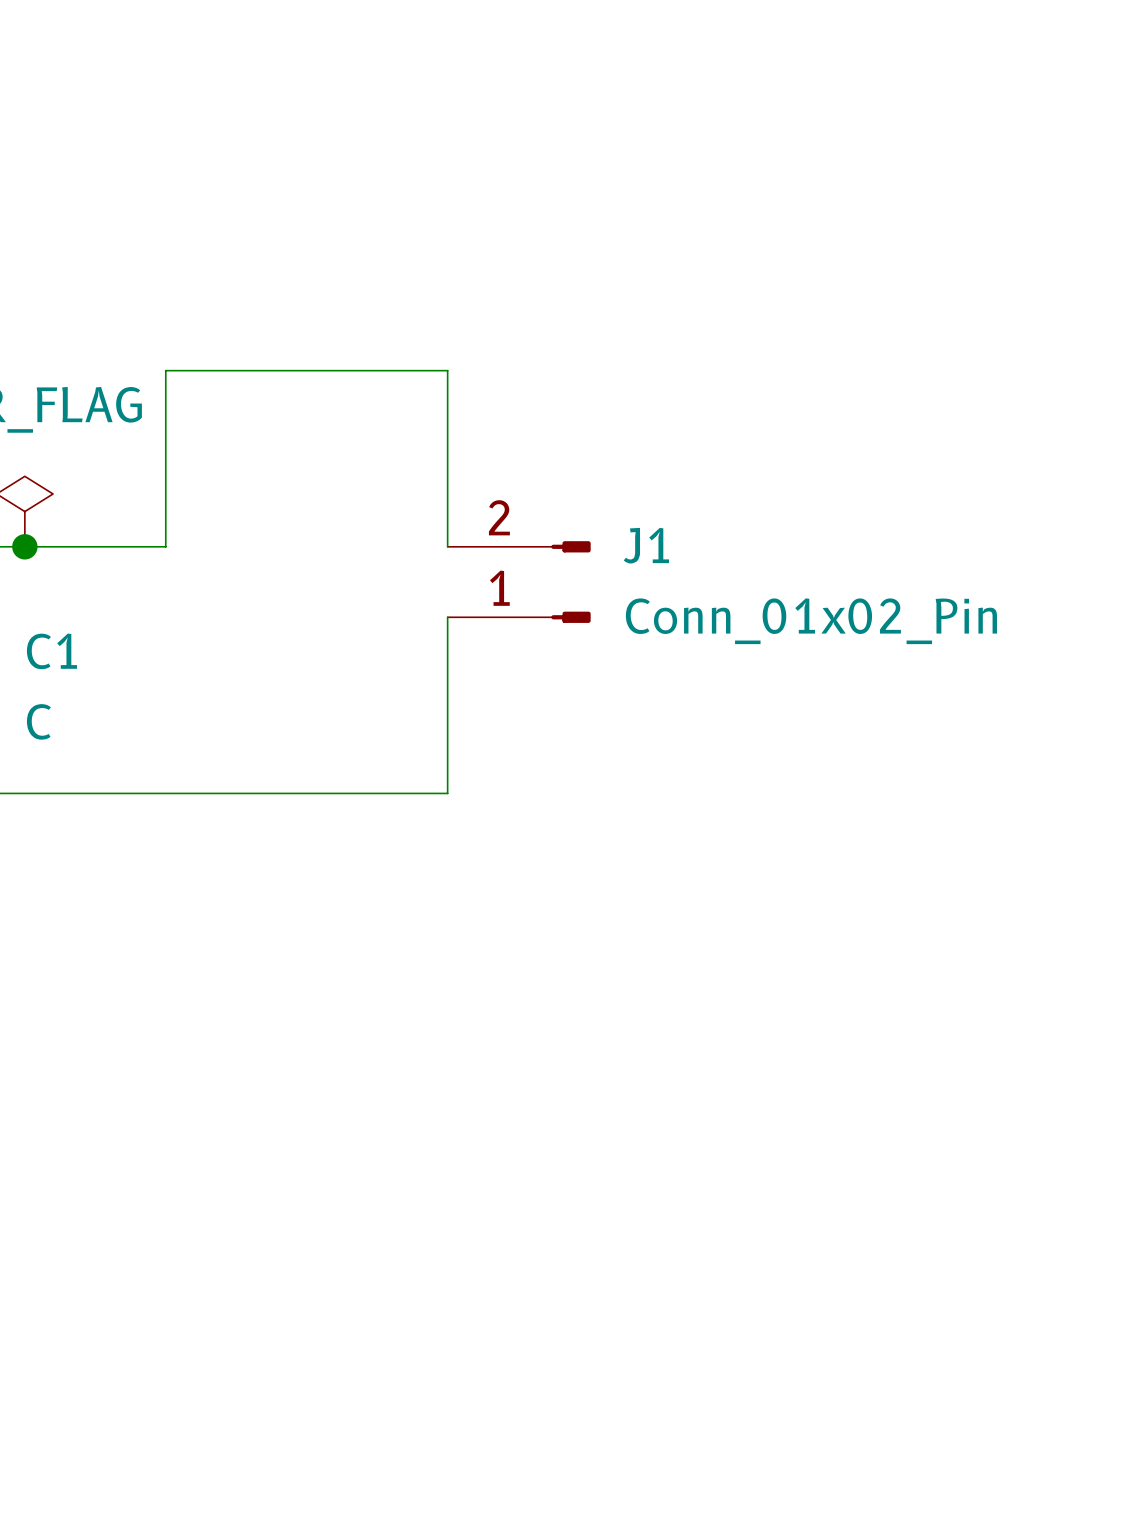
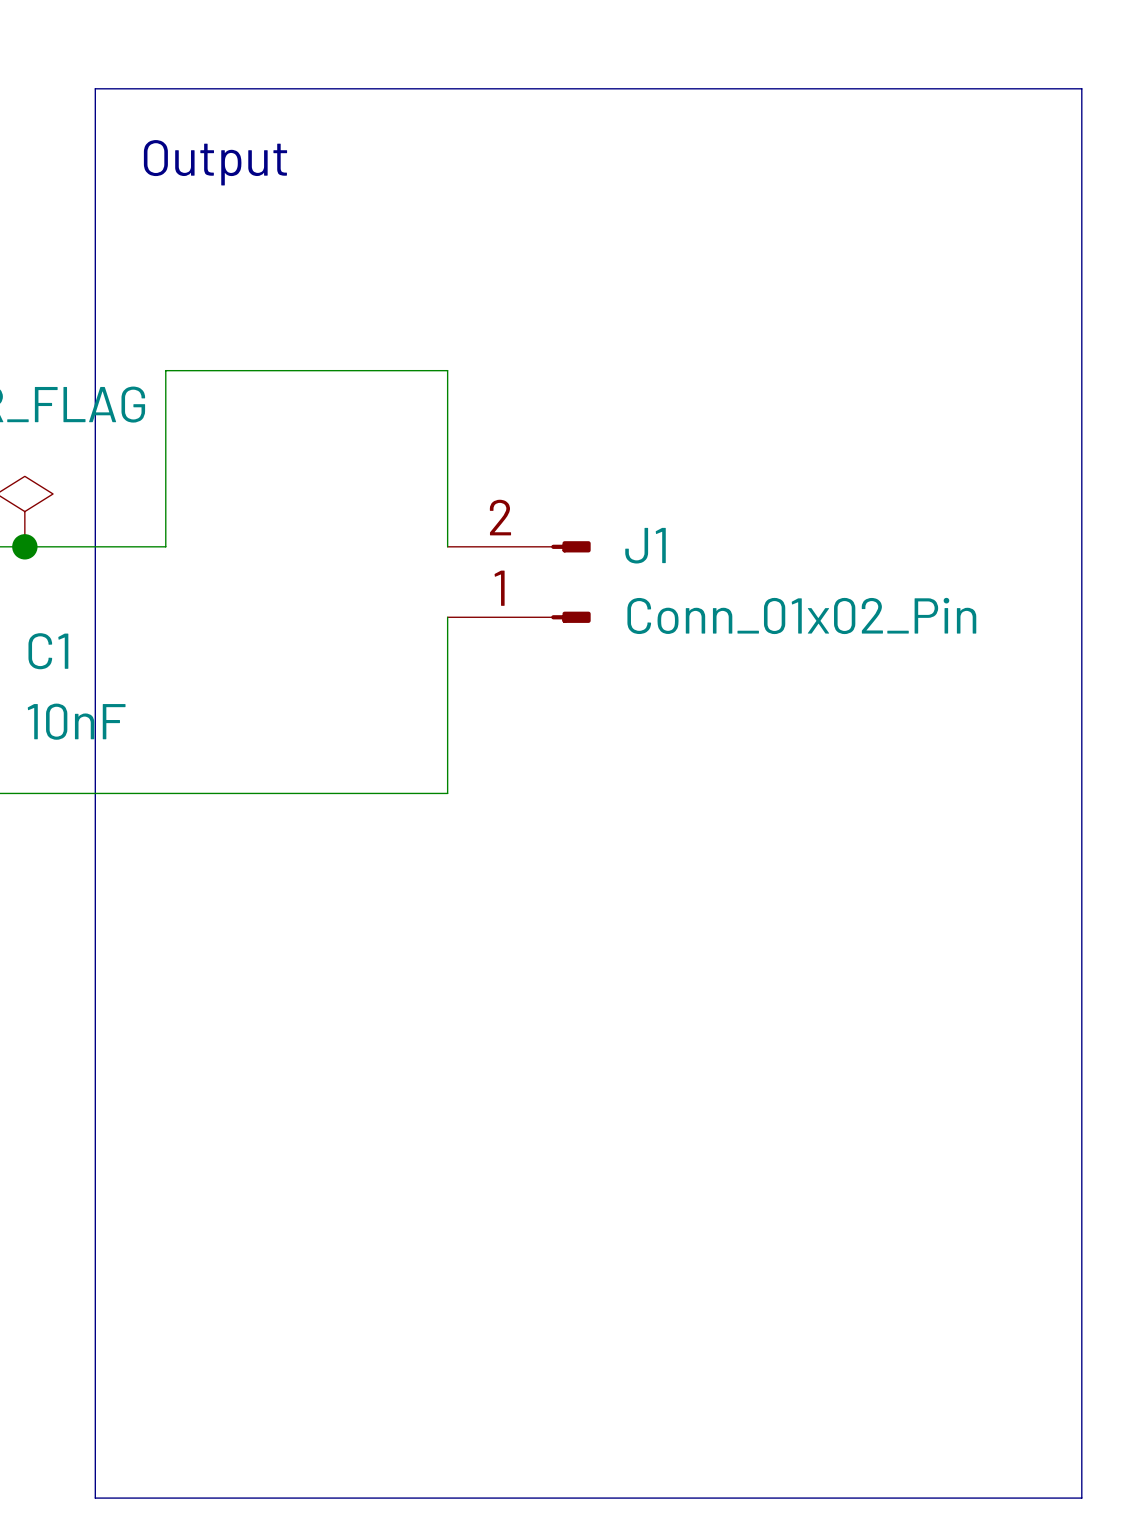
line: none -> (95, 88) (1081, 88) (1081, 1498) (95, 1498) (95, 88)
text: none -> Output (215, 162)
C1 value: C (38, 721) -> 10nF (76, 721)

